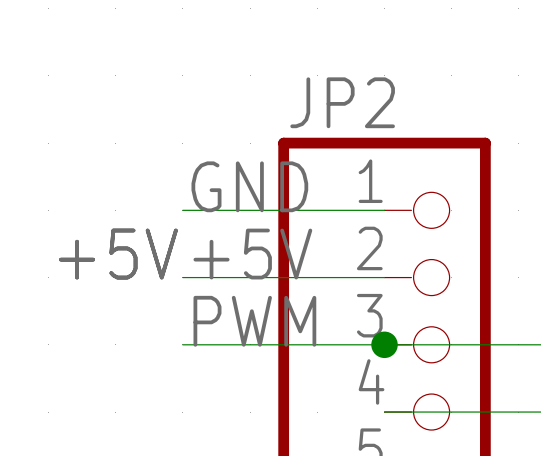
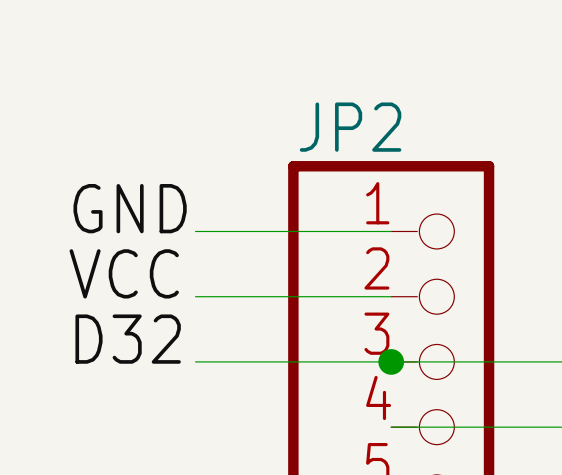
label position: GND (249, 186) -> GND (130, 208)
label: +5V (118, 254) -> VCC (124, 273)
label: +5V (252, 254) -> none
label: none -> D32 (128, 339)
label: PWM (254, 321) -> none

